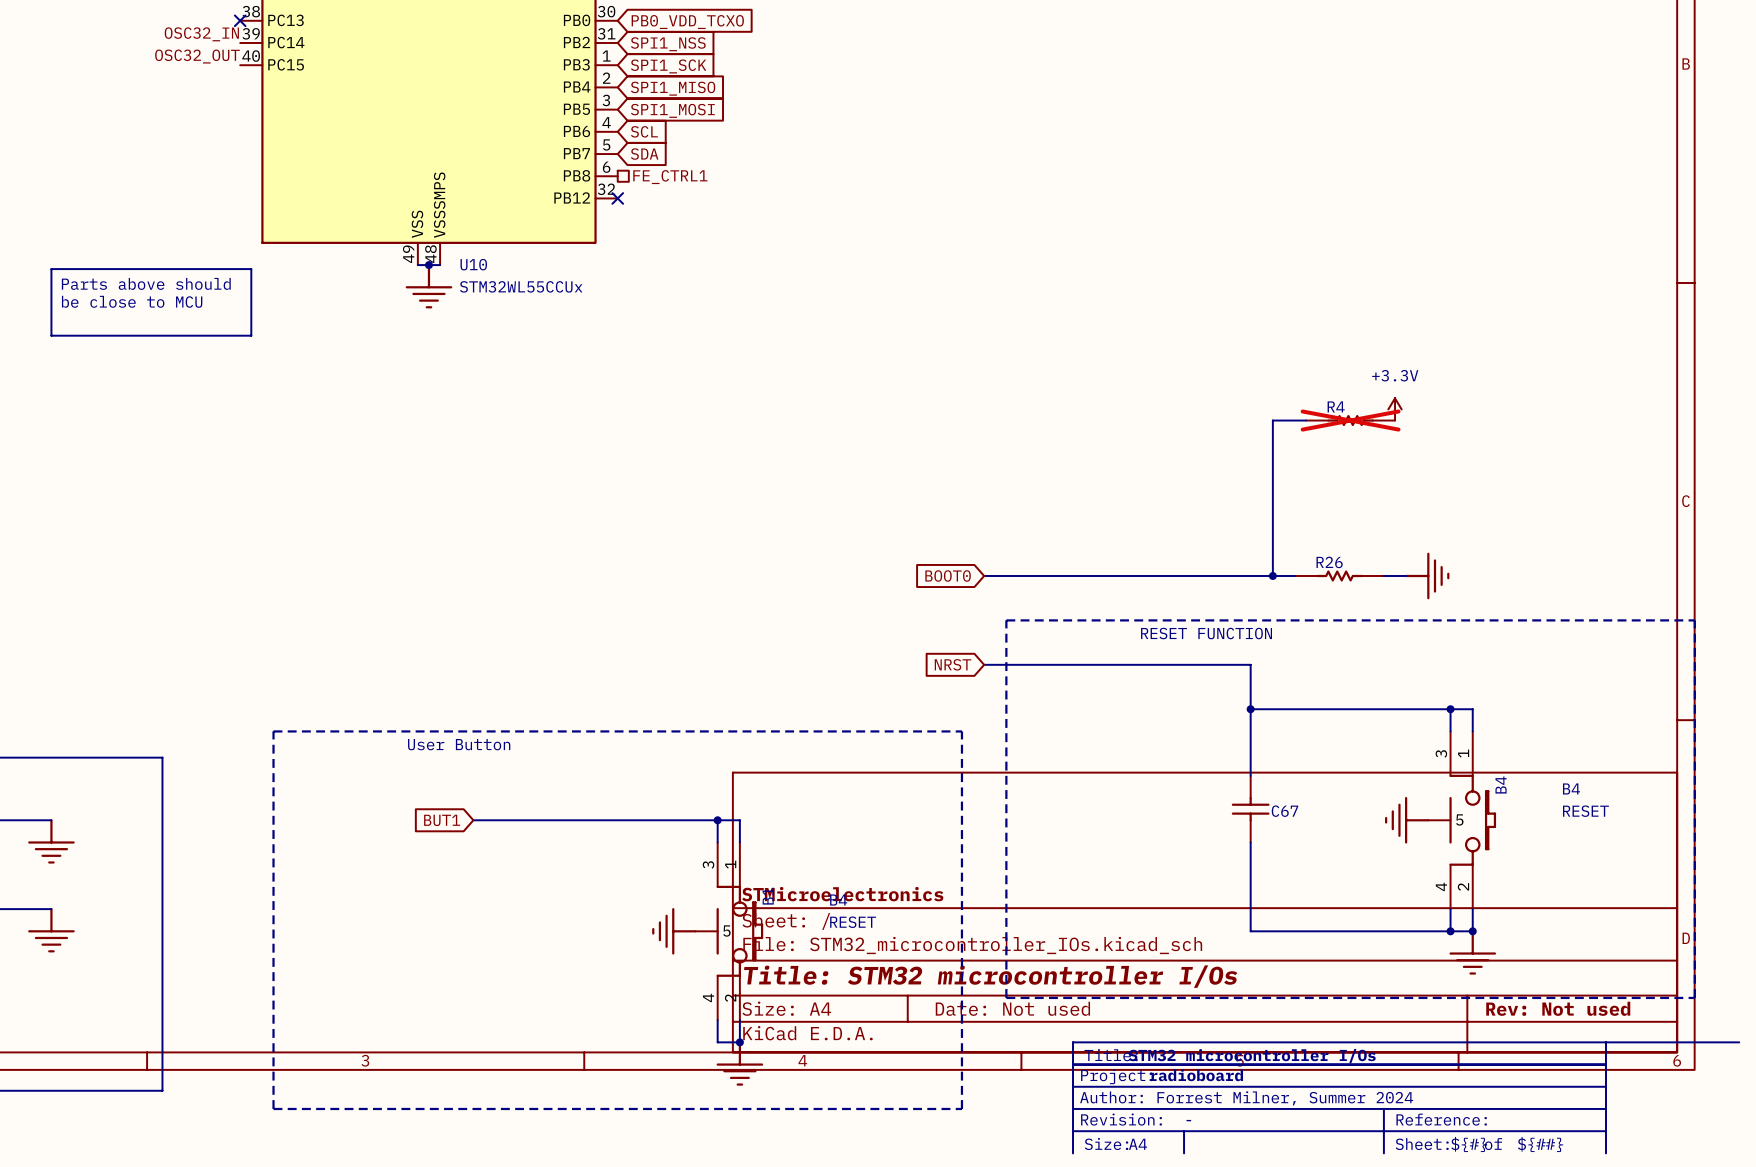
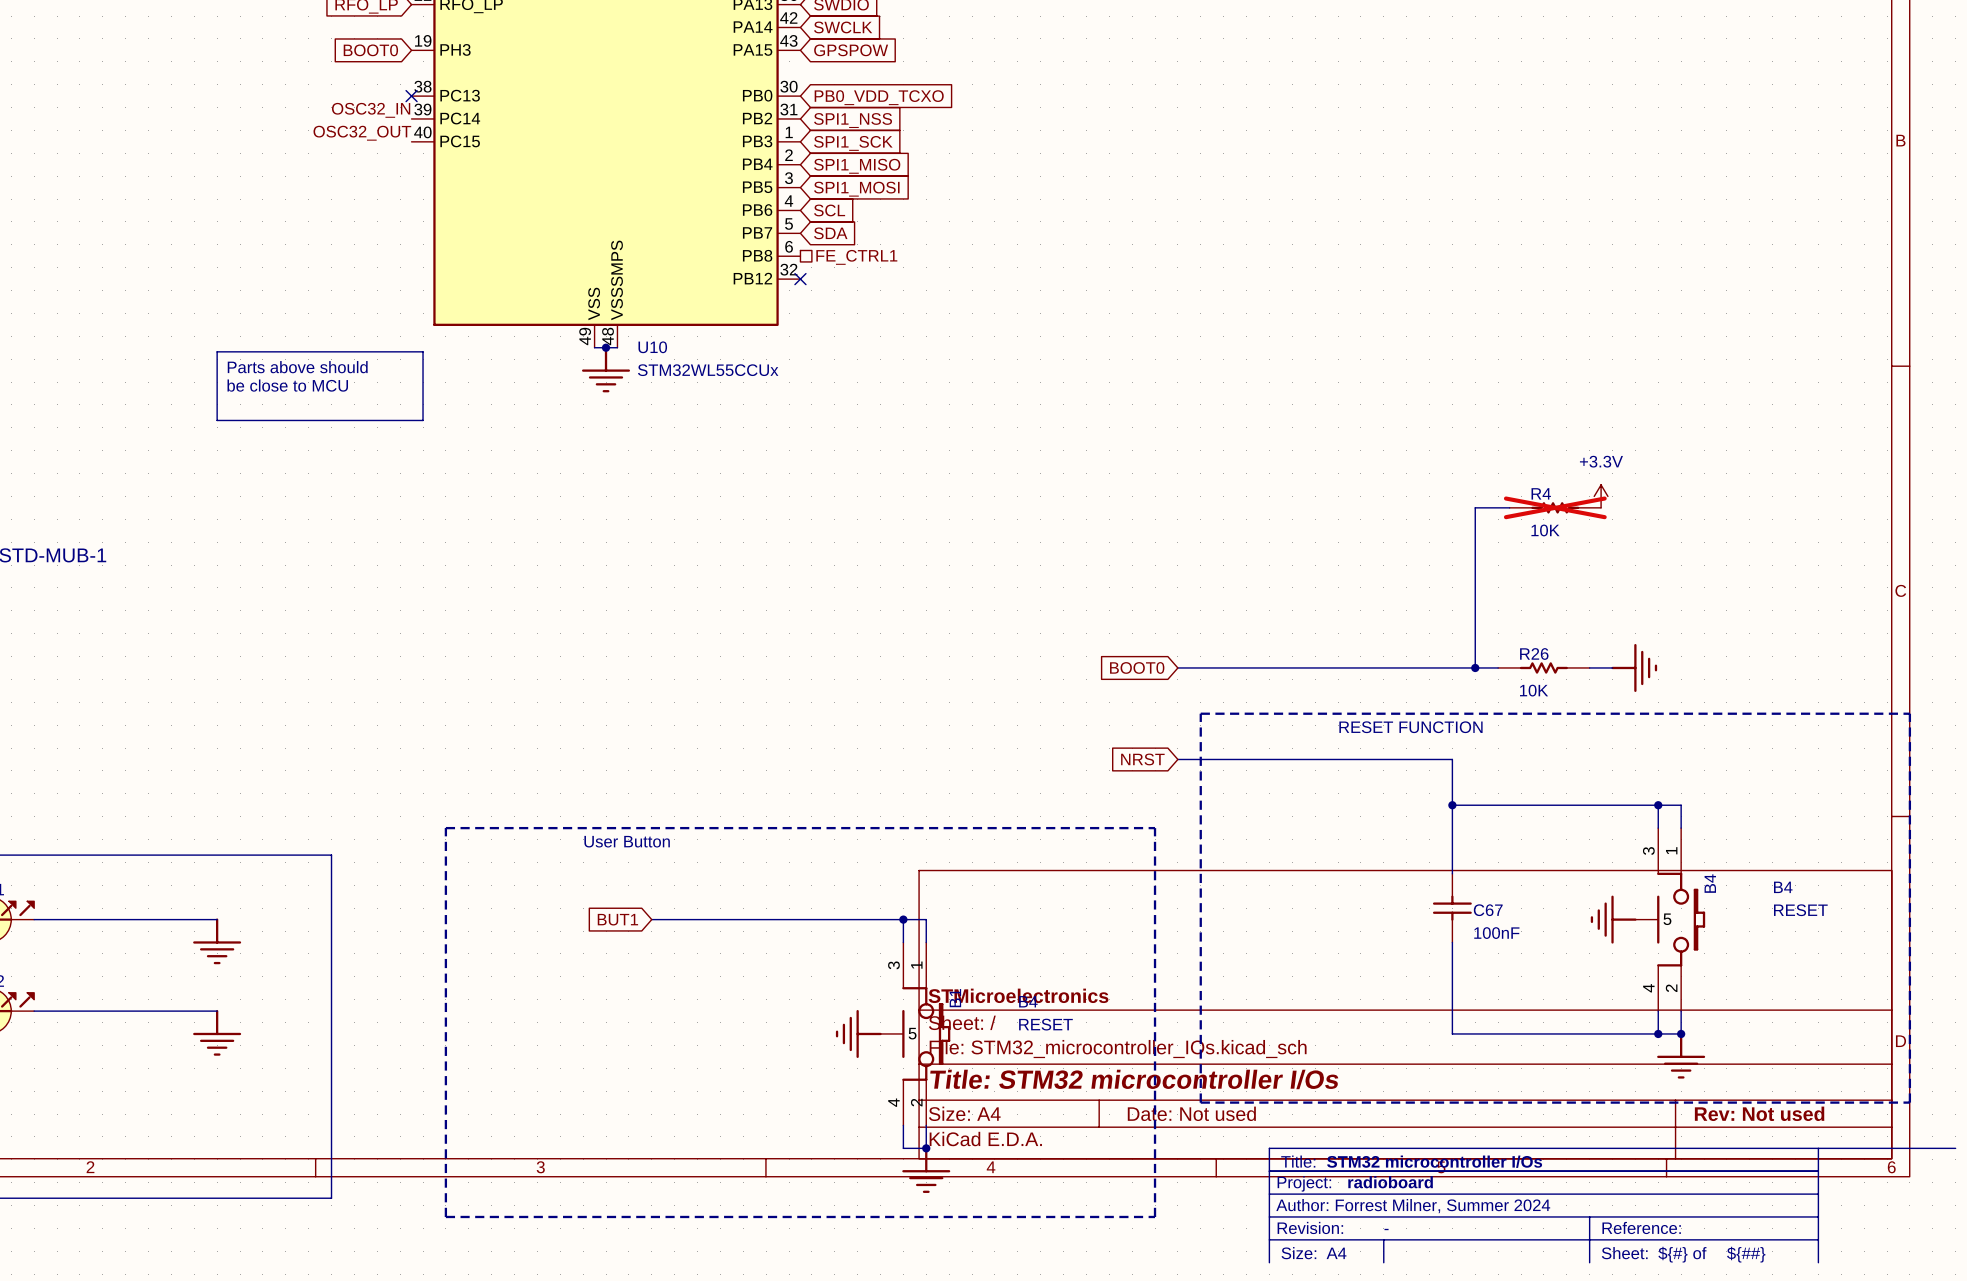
R4 text: none -> 10K (1545, 530)
R26 text: none -> 10K (1534, 690)
C67 text: none -> 100nF (1496, 933)

